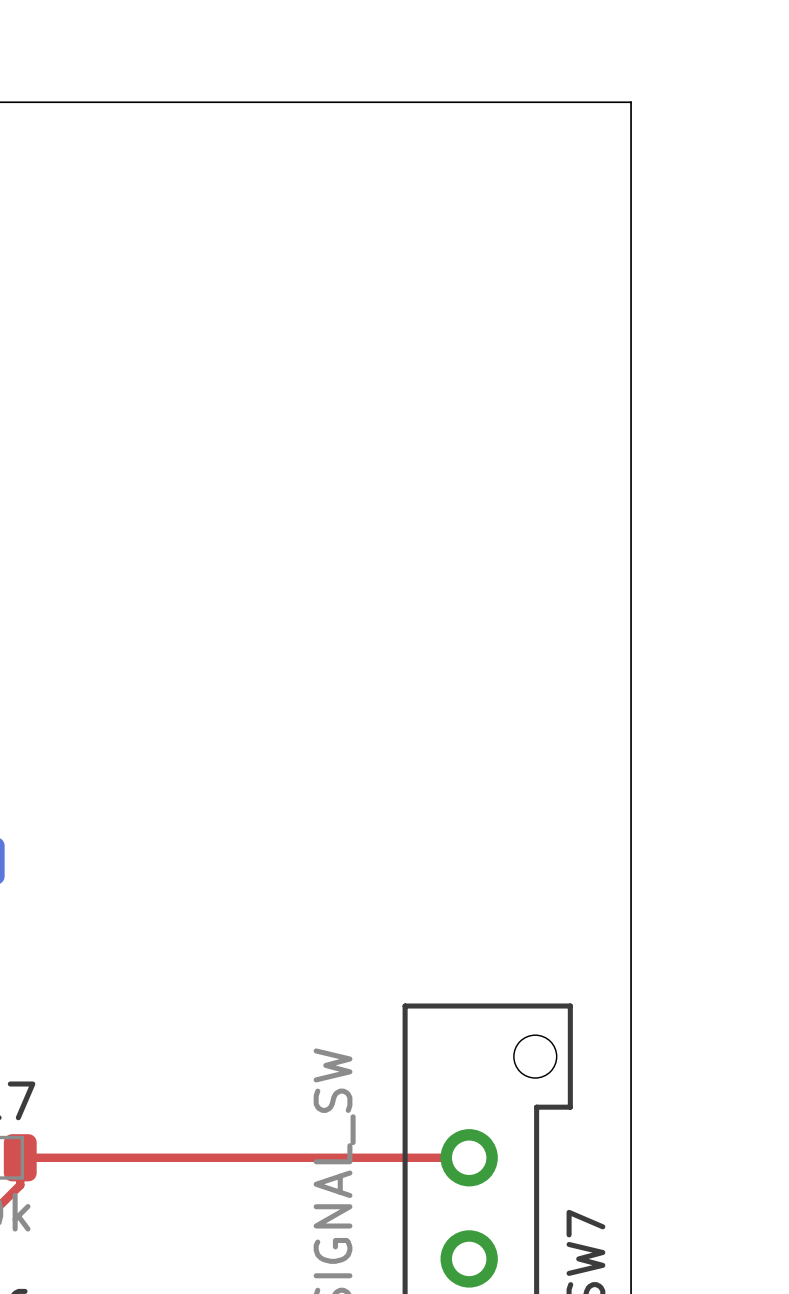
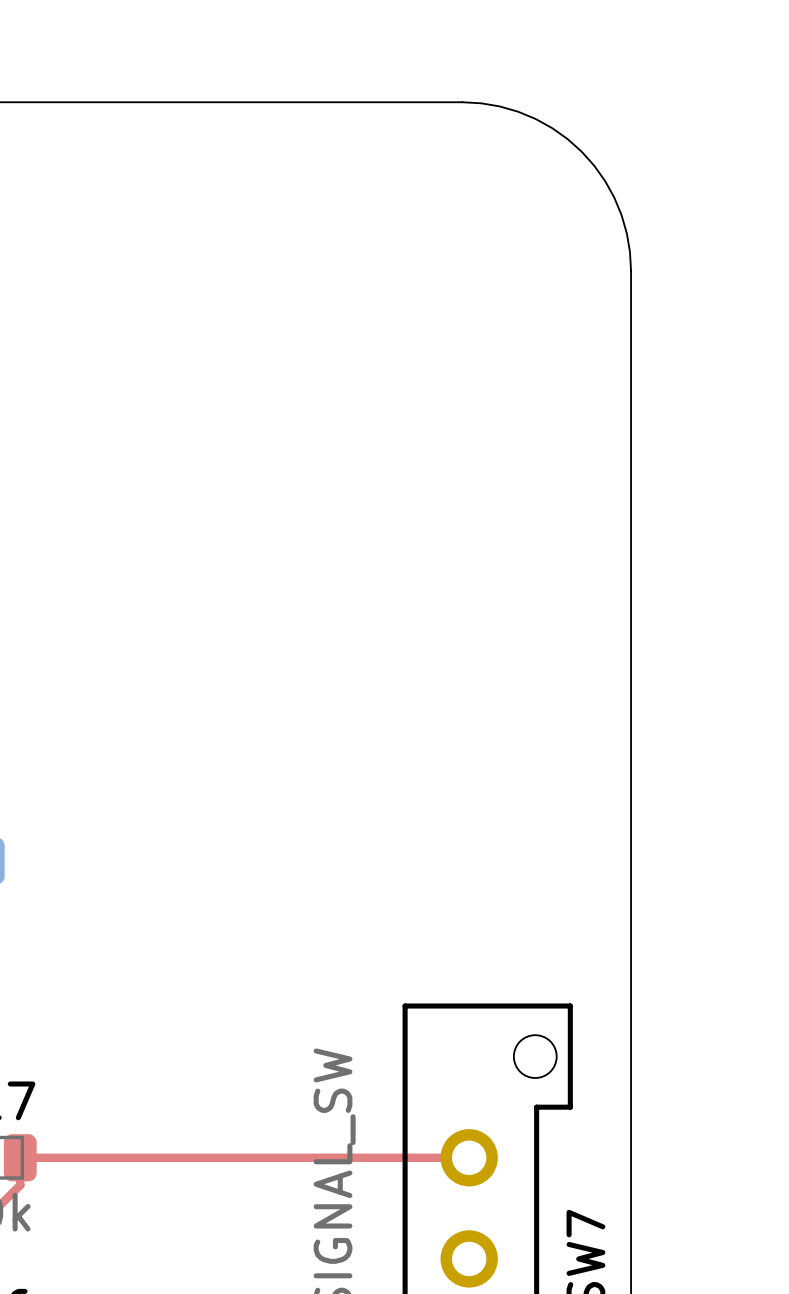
board edge: (462, 102) (631, 102) (631, 270) -> (462, 102) (481, 103) (518, 111) (552, 128) (581, 151) (605, 181) (621, 215) (629, 251) (631, 270)

